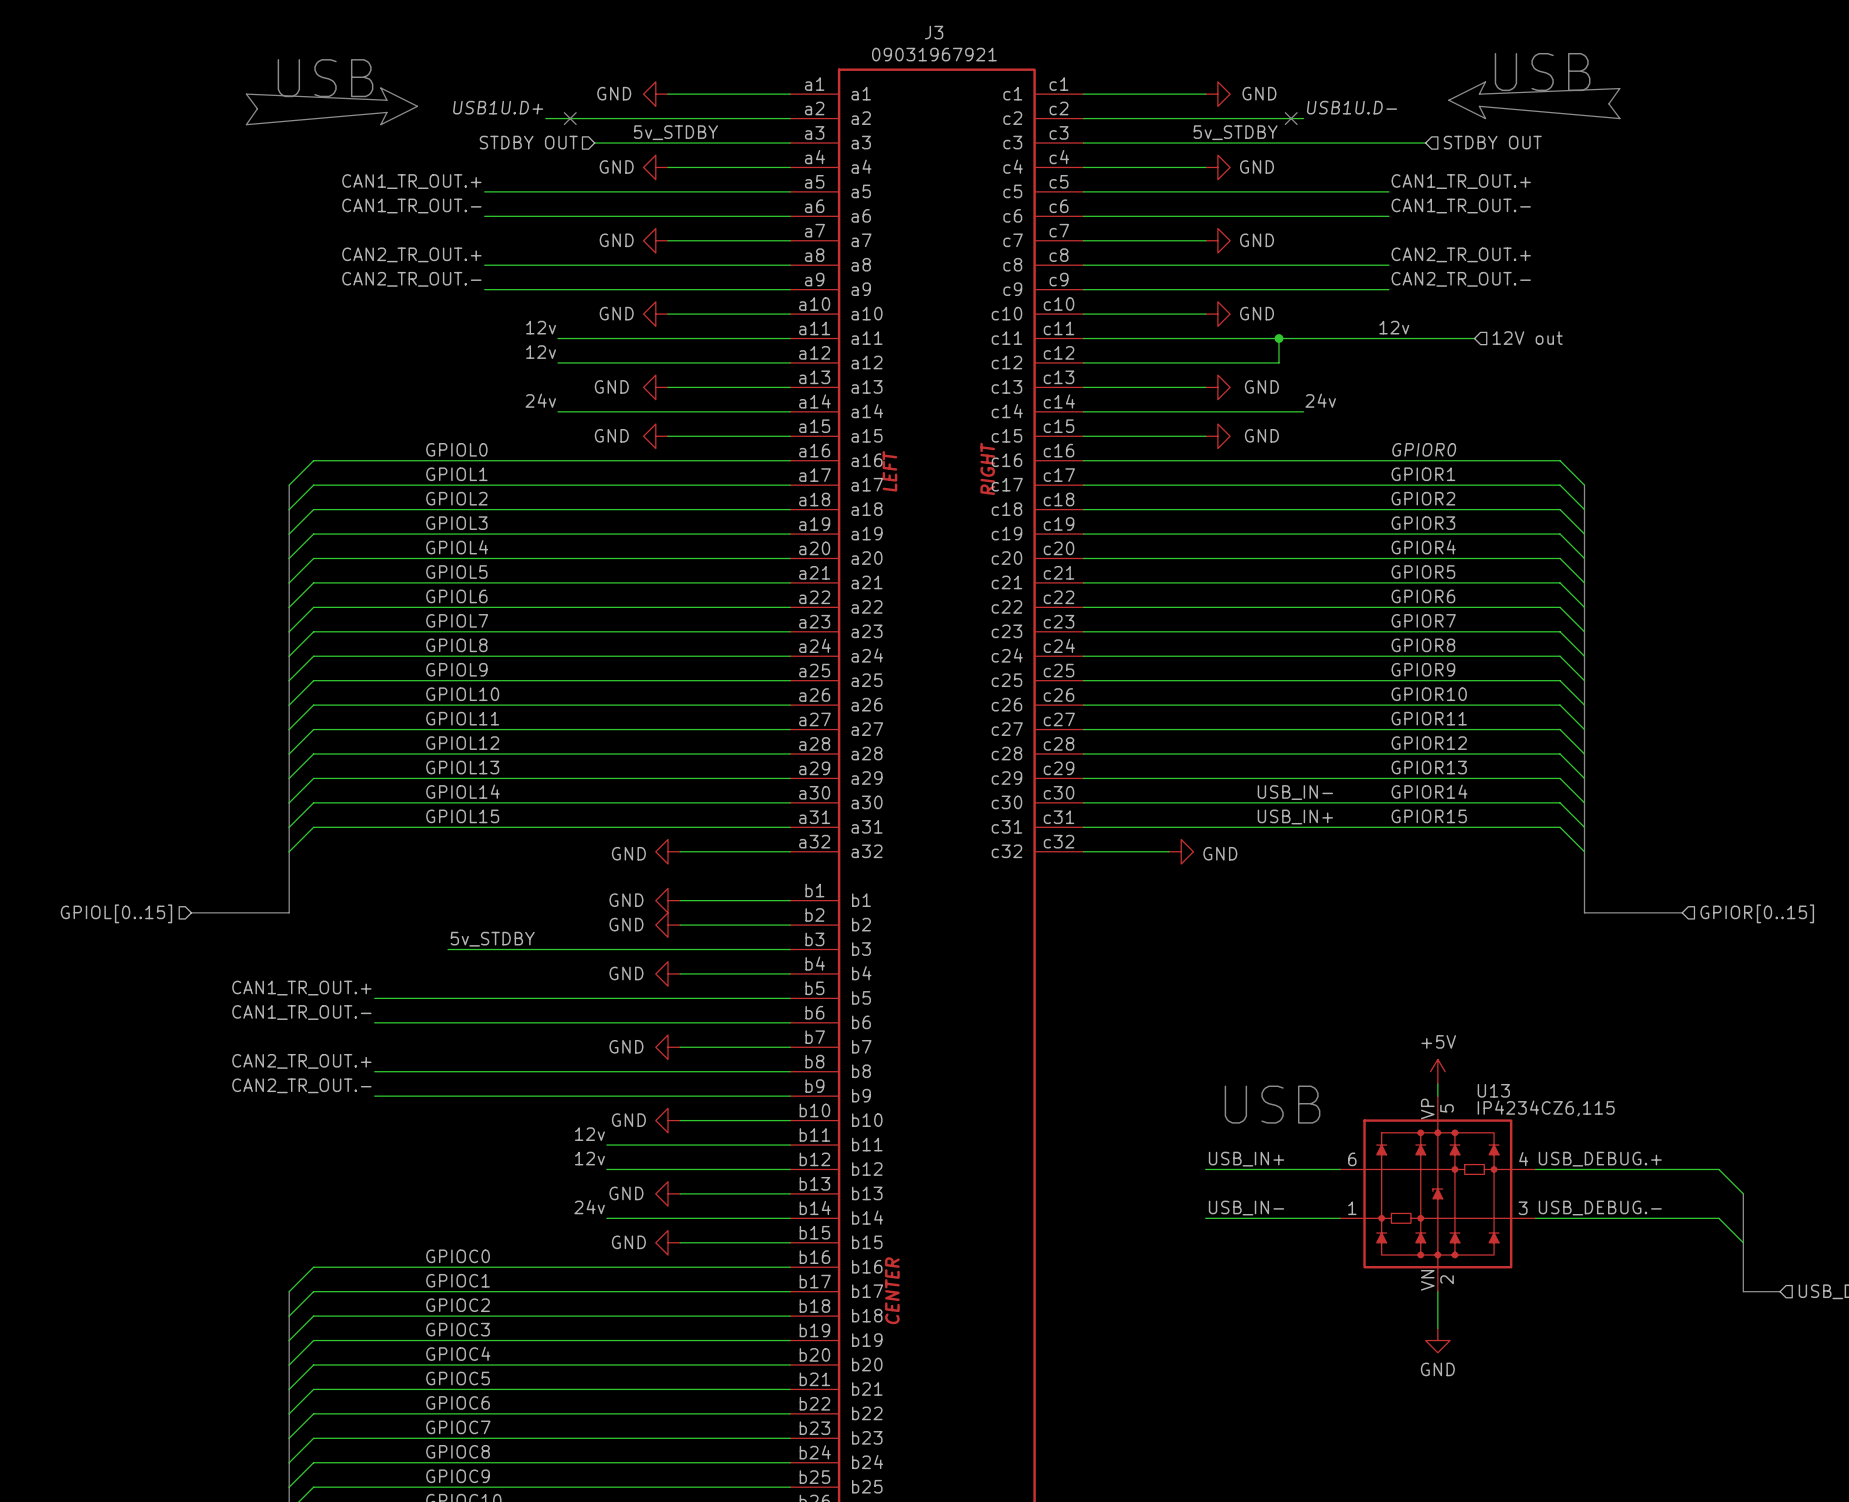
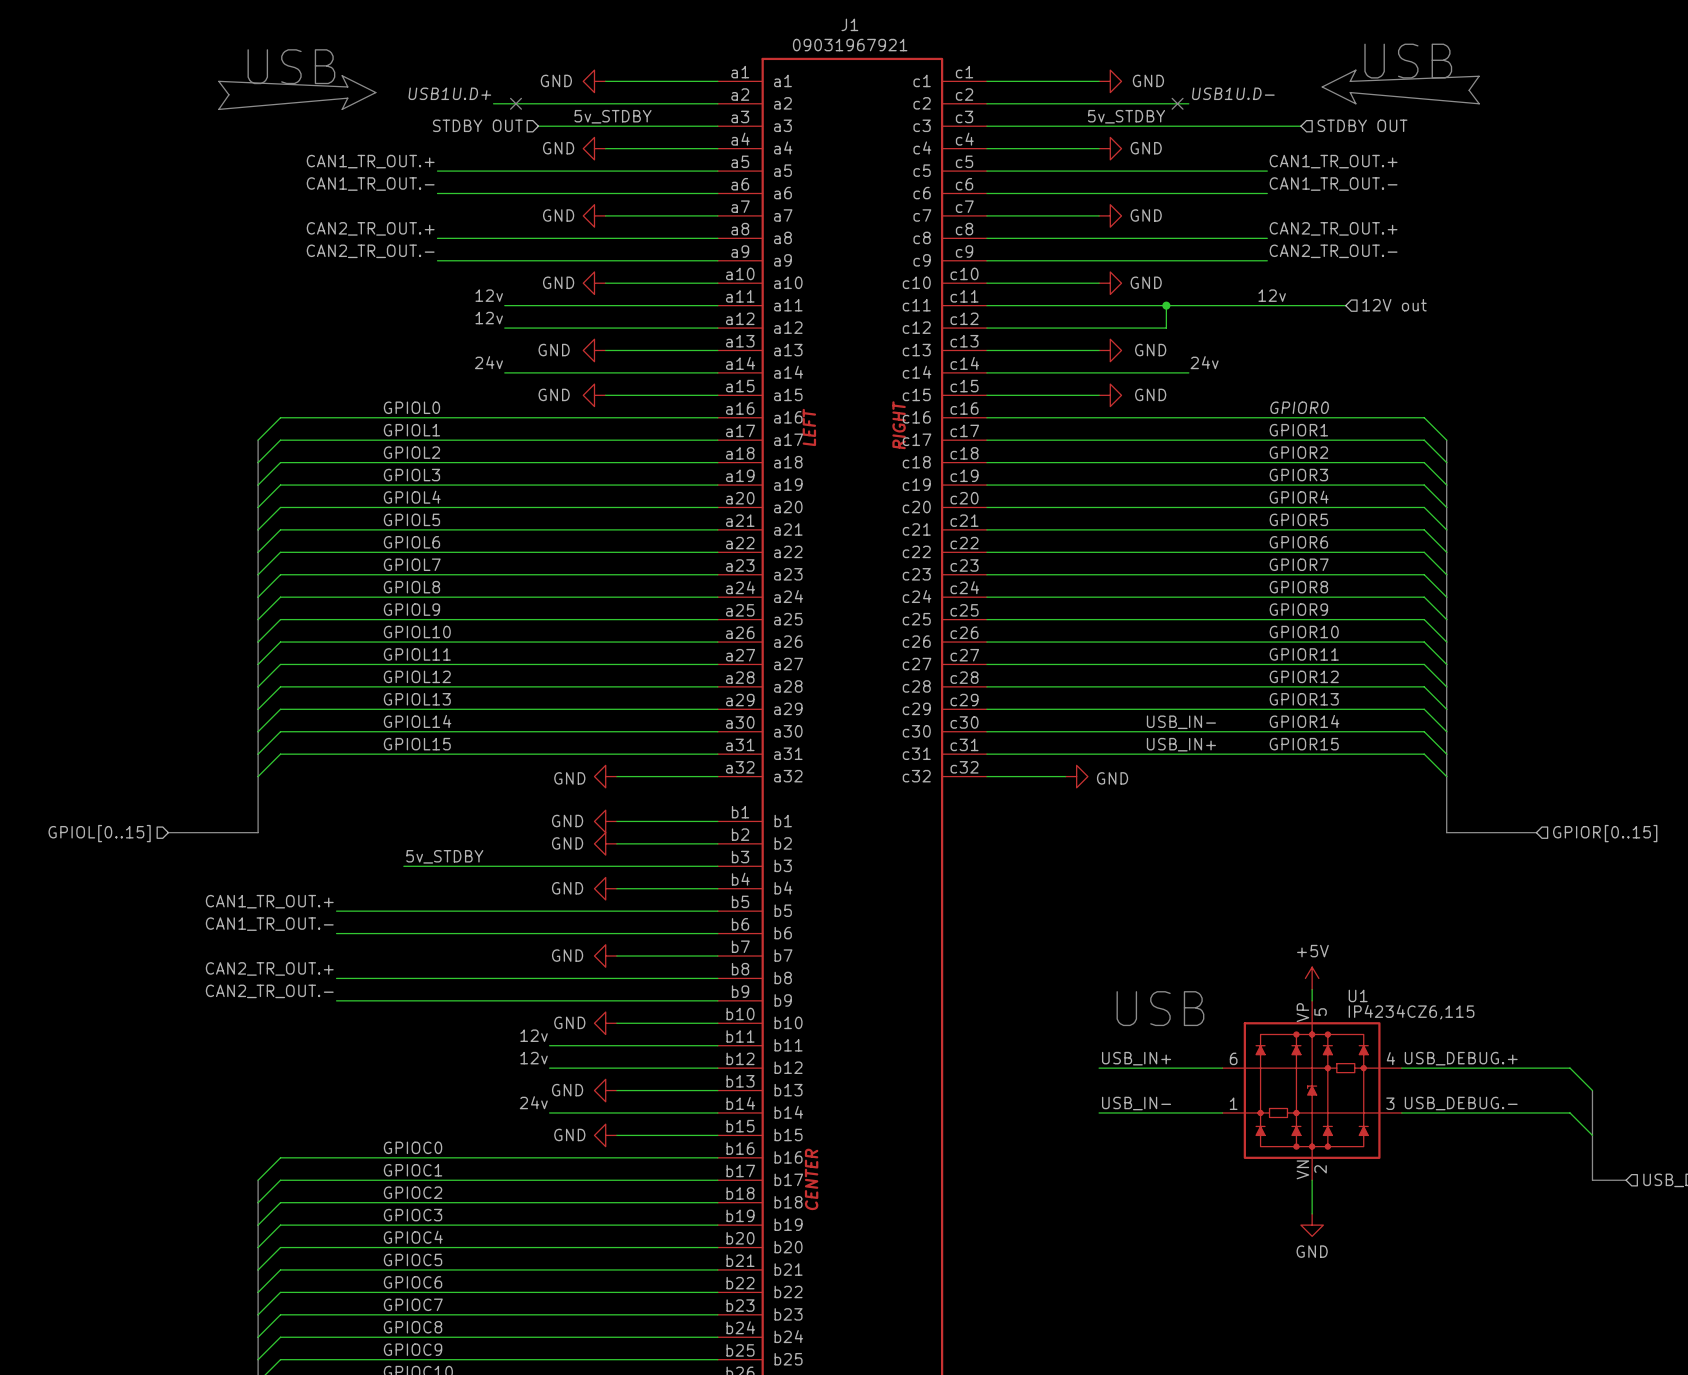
J3 name: J3 (934, 32) -> J1 (849, 24)
U13 name: U13 (1493, 1090) -> U1 (1358, 995)

